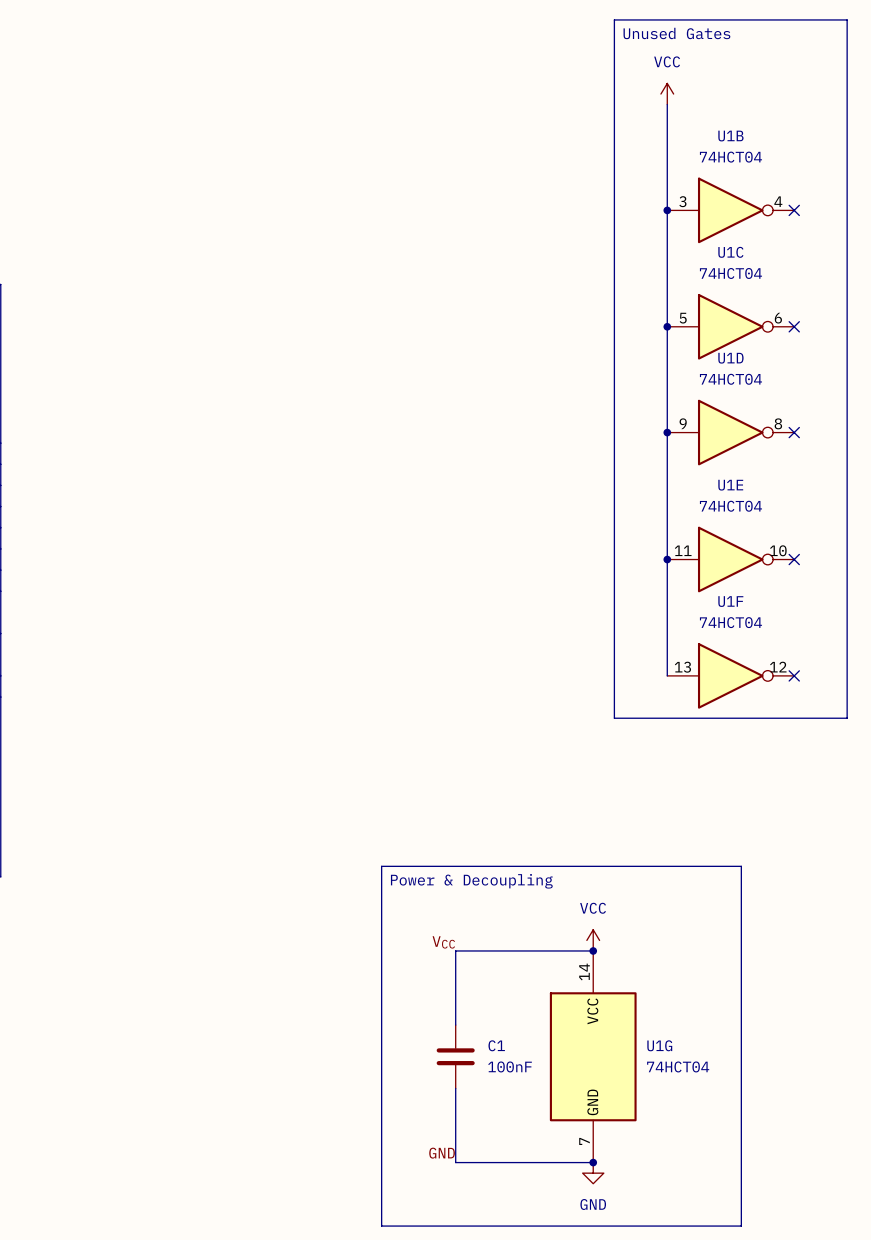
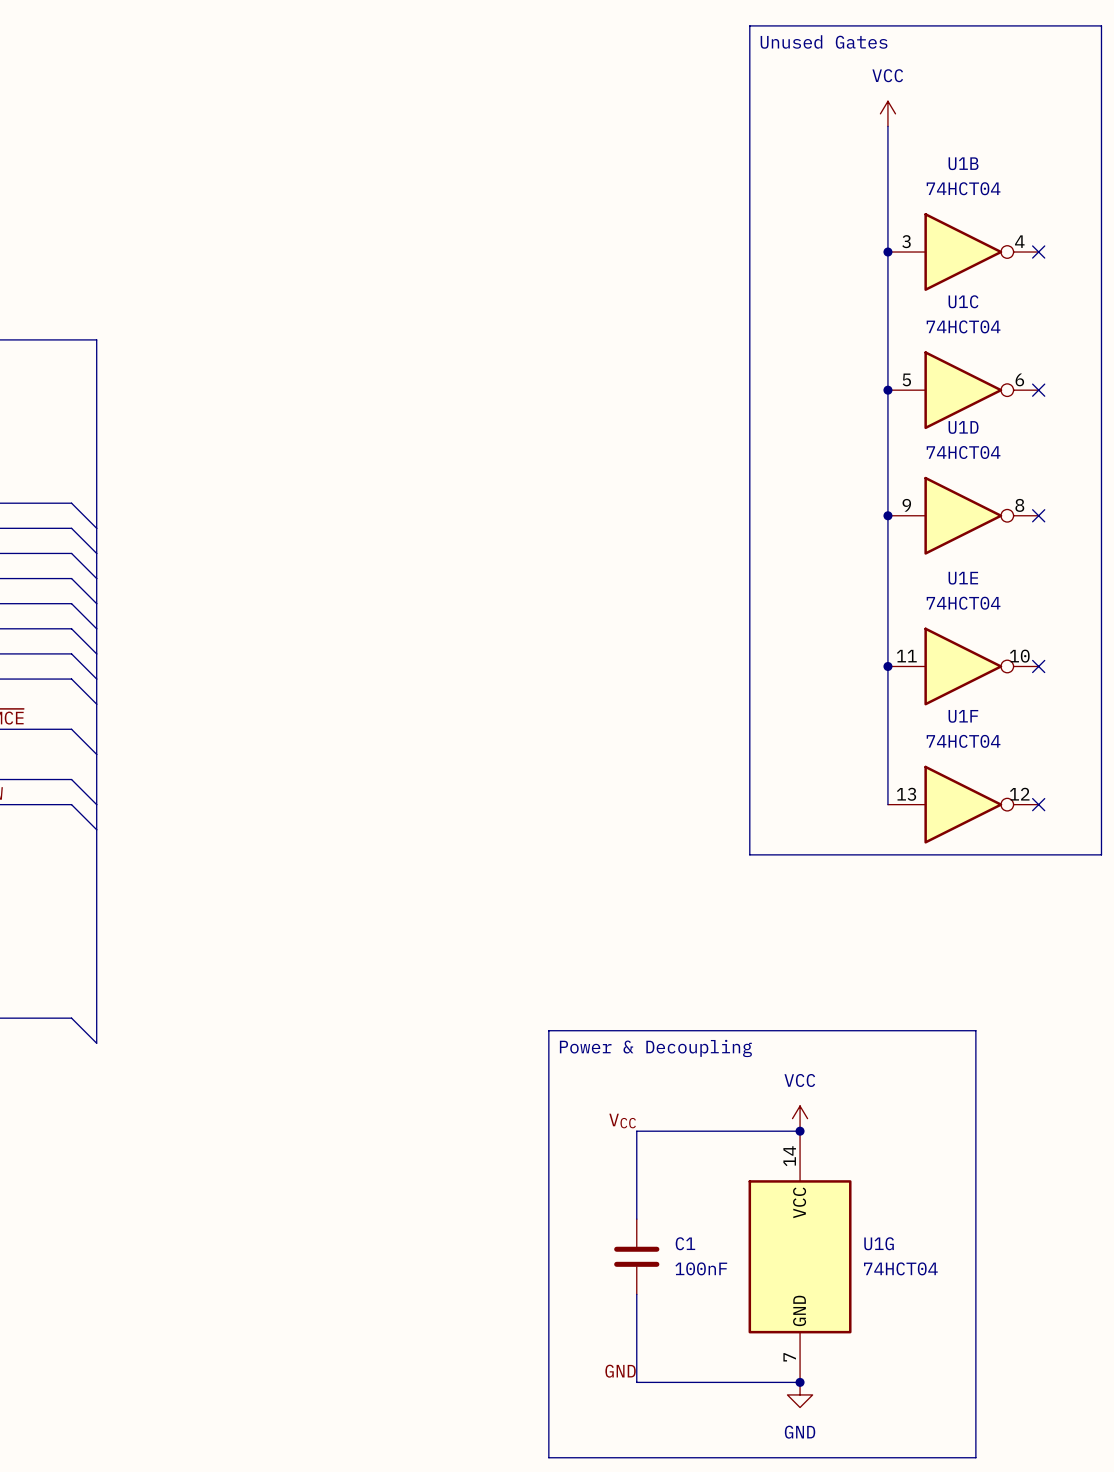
line: (614, 19) (614, 718) -> (825, 25) (749, 25) (749, 854) (825, 854)
text position: Unused Gates (676, 33) -> Unused Gates (824, 41)

